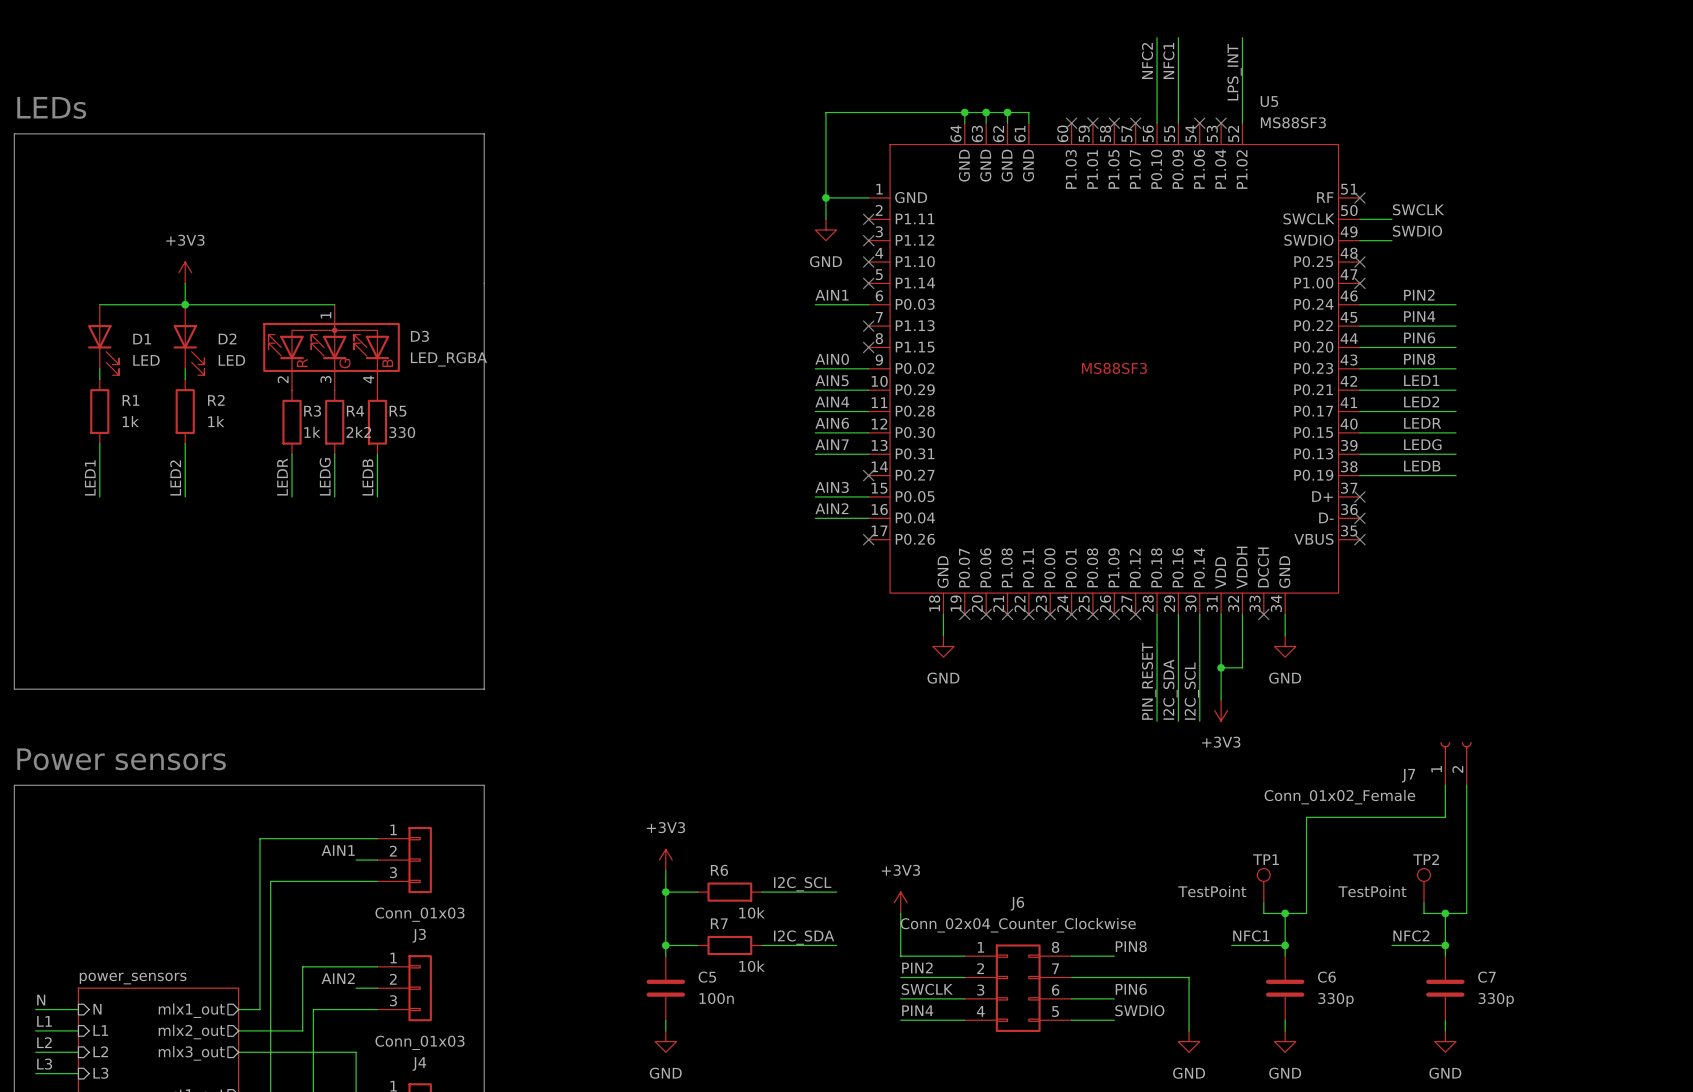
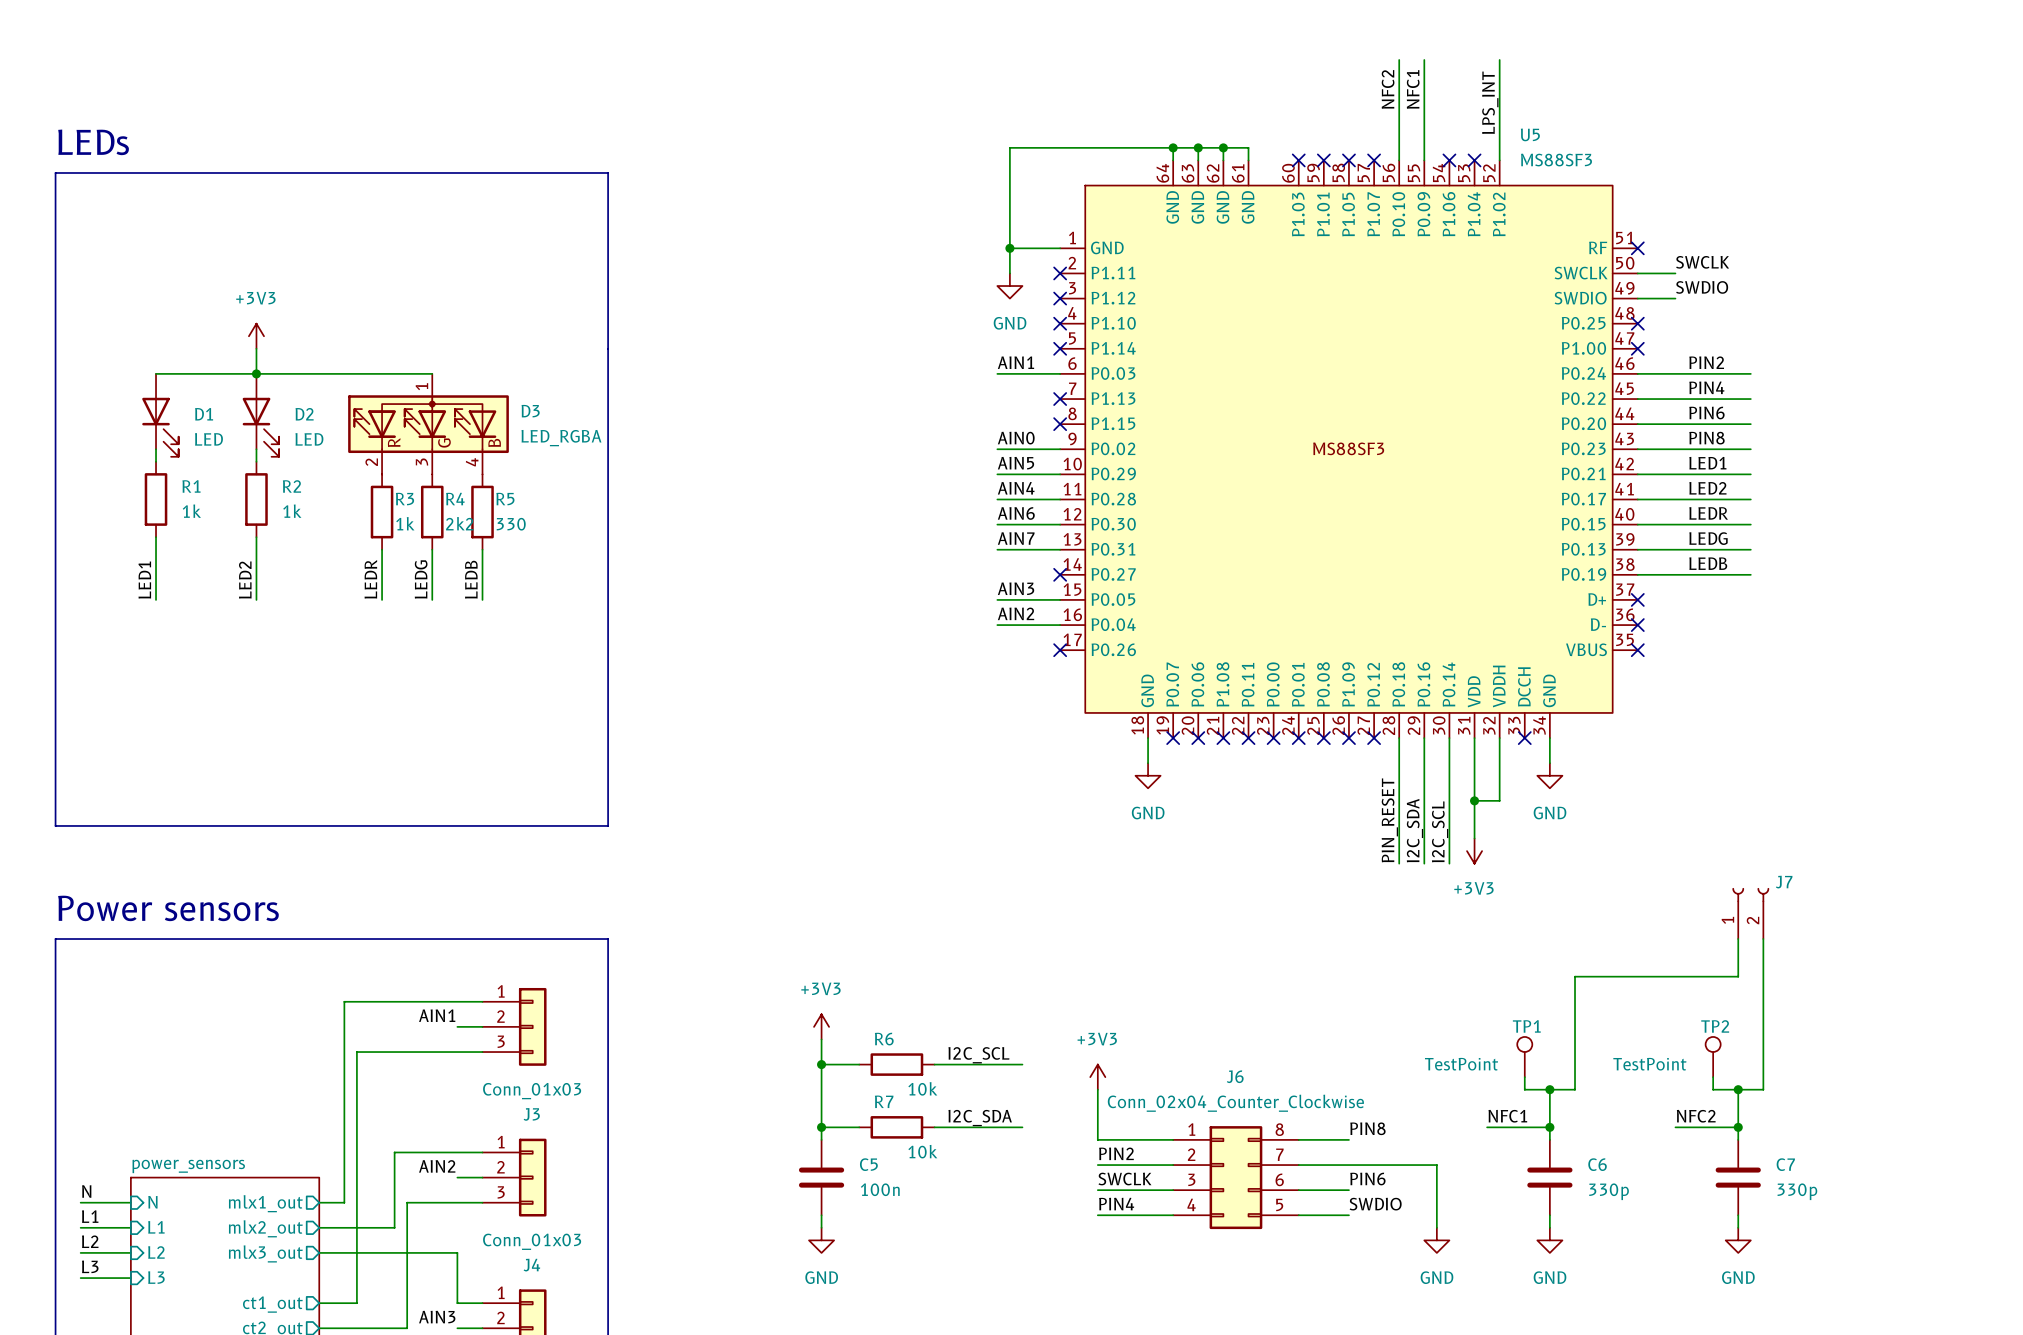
J7 name position: J7 (1408, 775) -> J7 (1784, 882)
J7 value: Conn_01x02_Female (1339, 797) -> none

